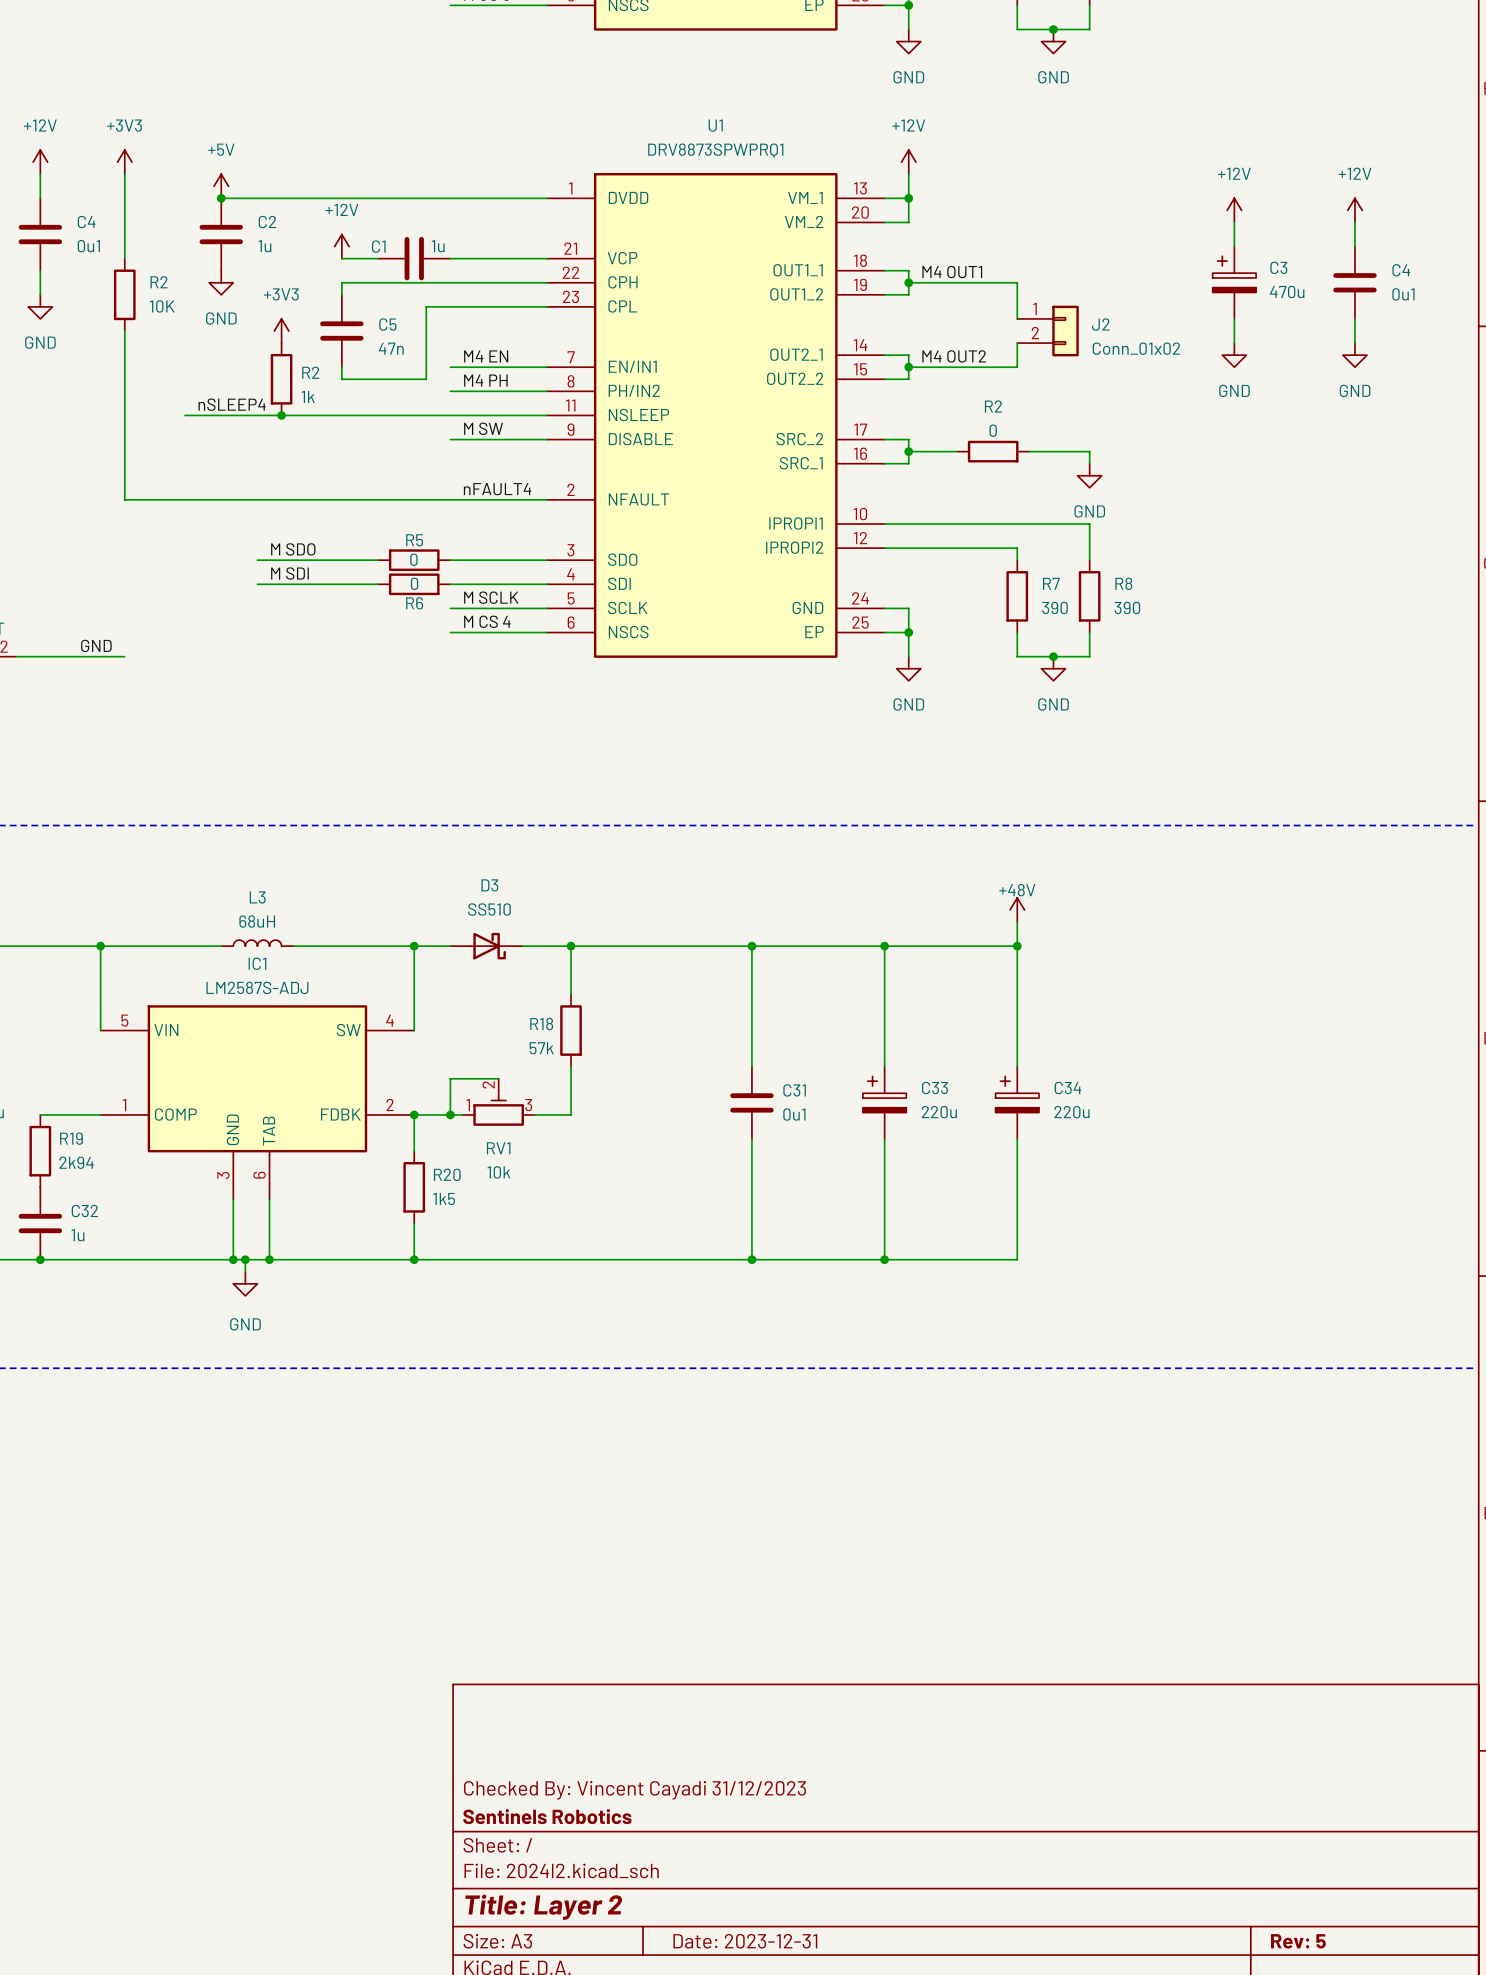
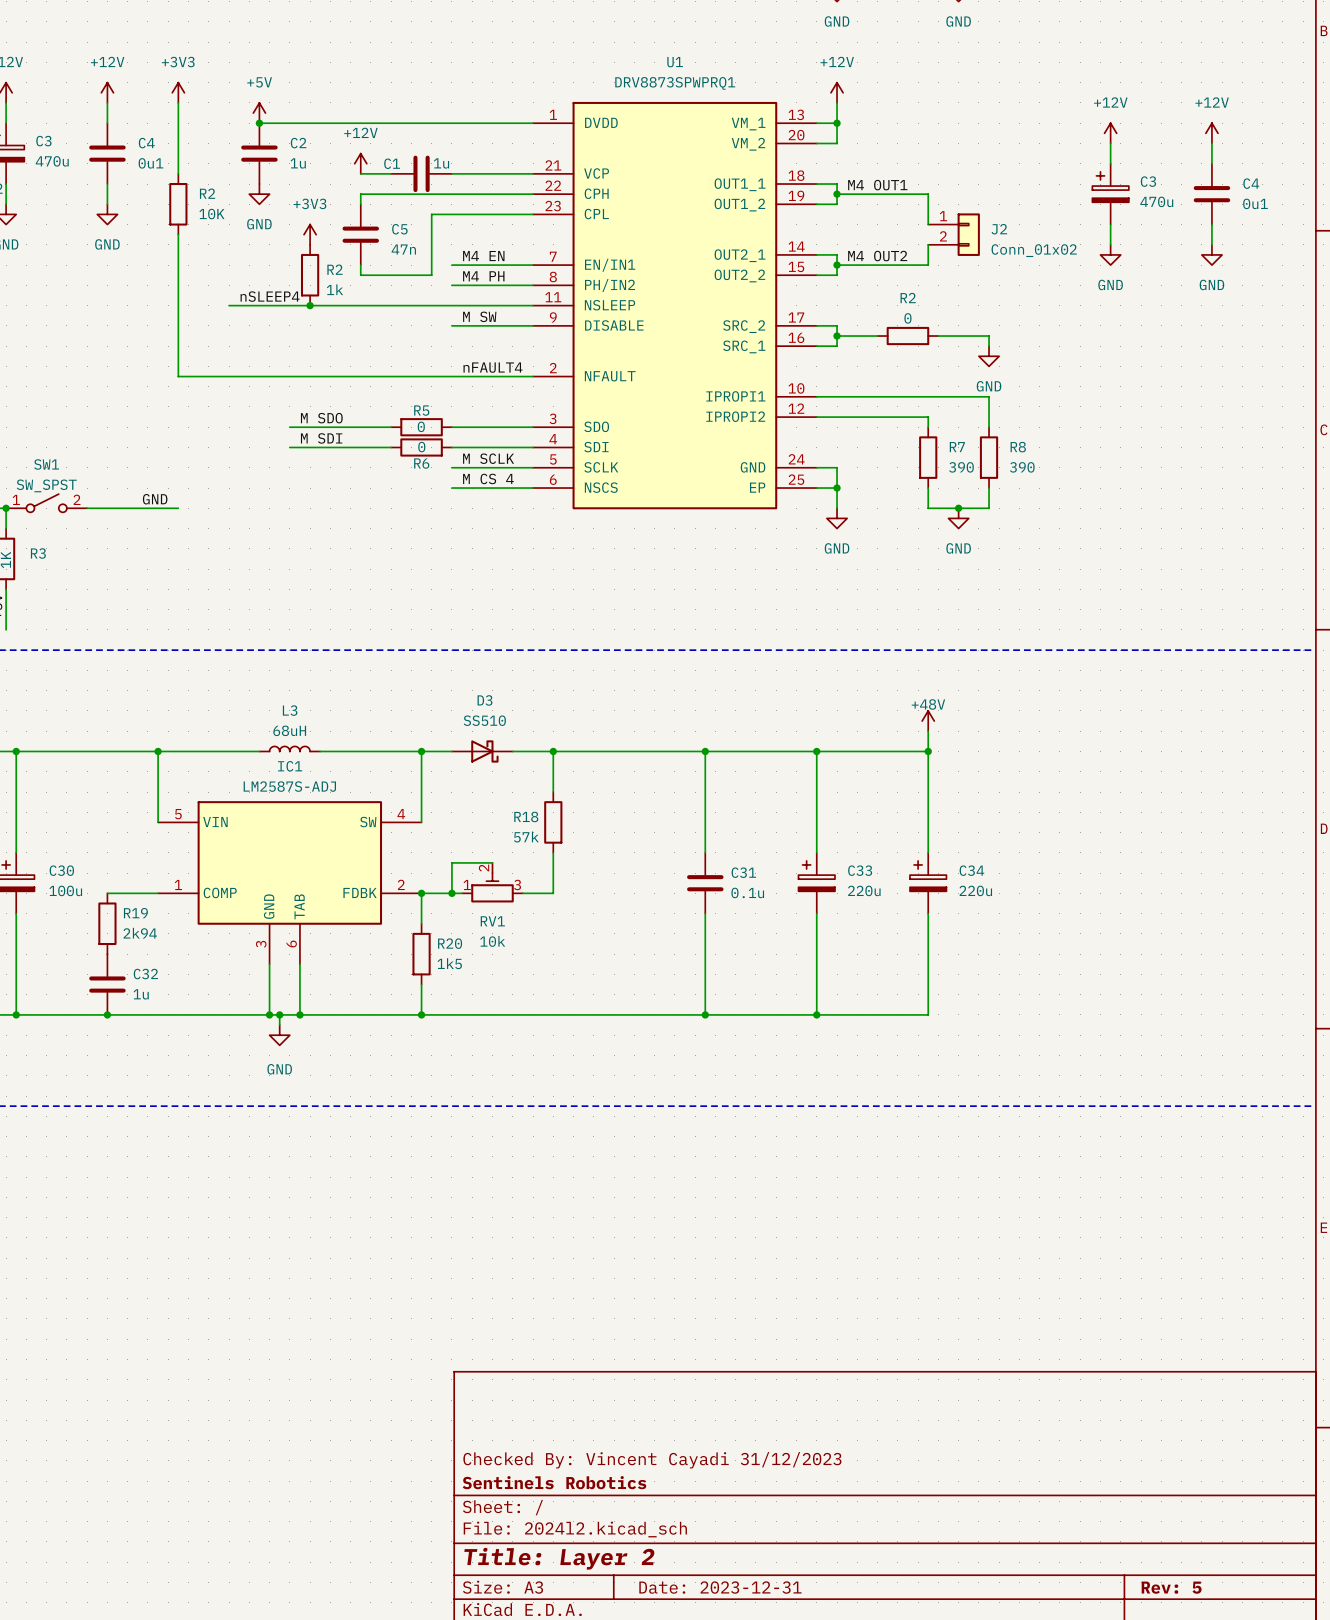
C31 value: 0u1 (794, 1114) -> 0.1u (747, 892)

